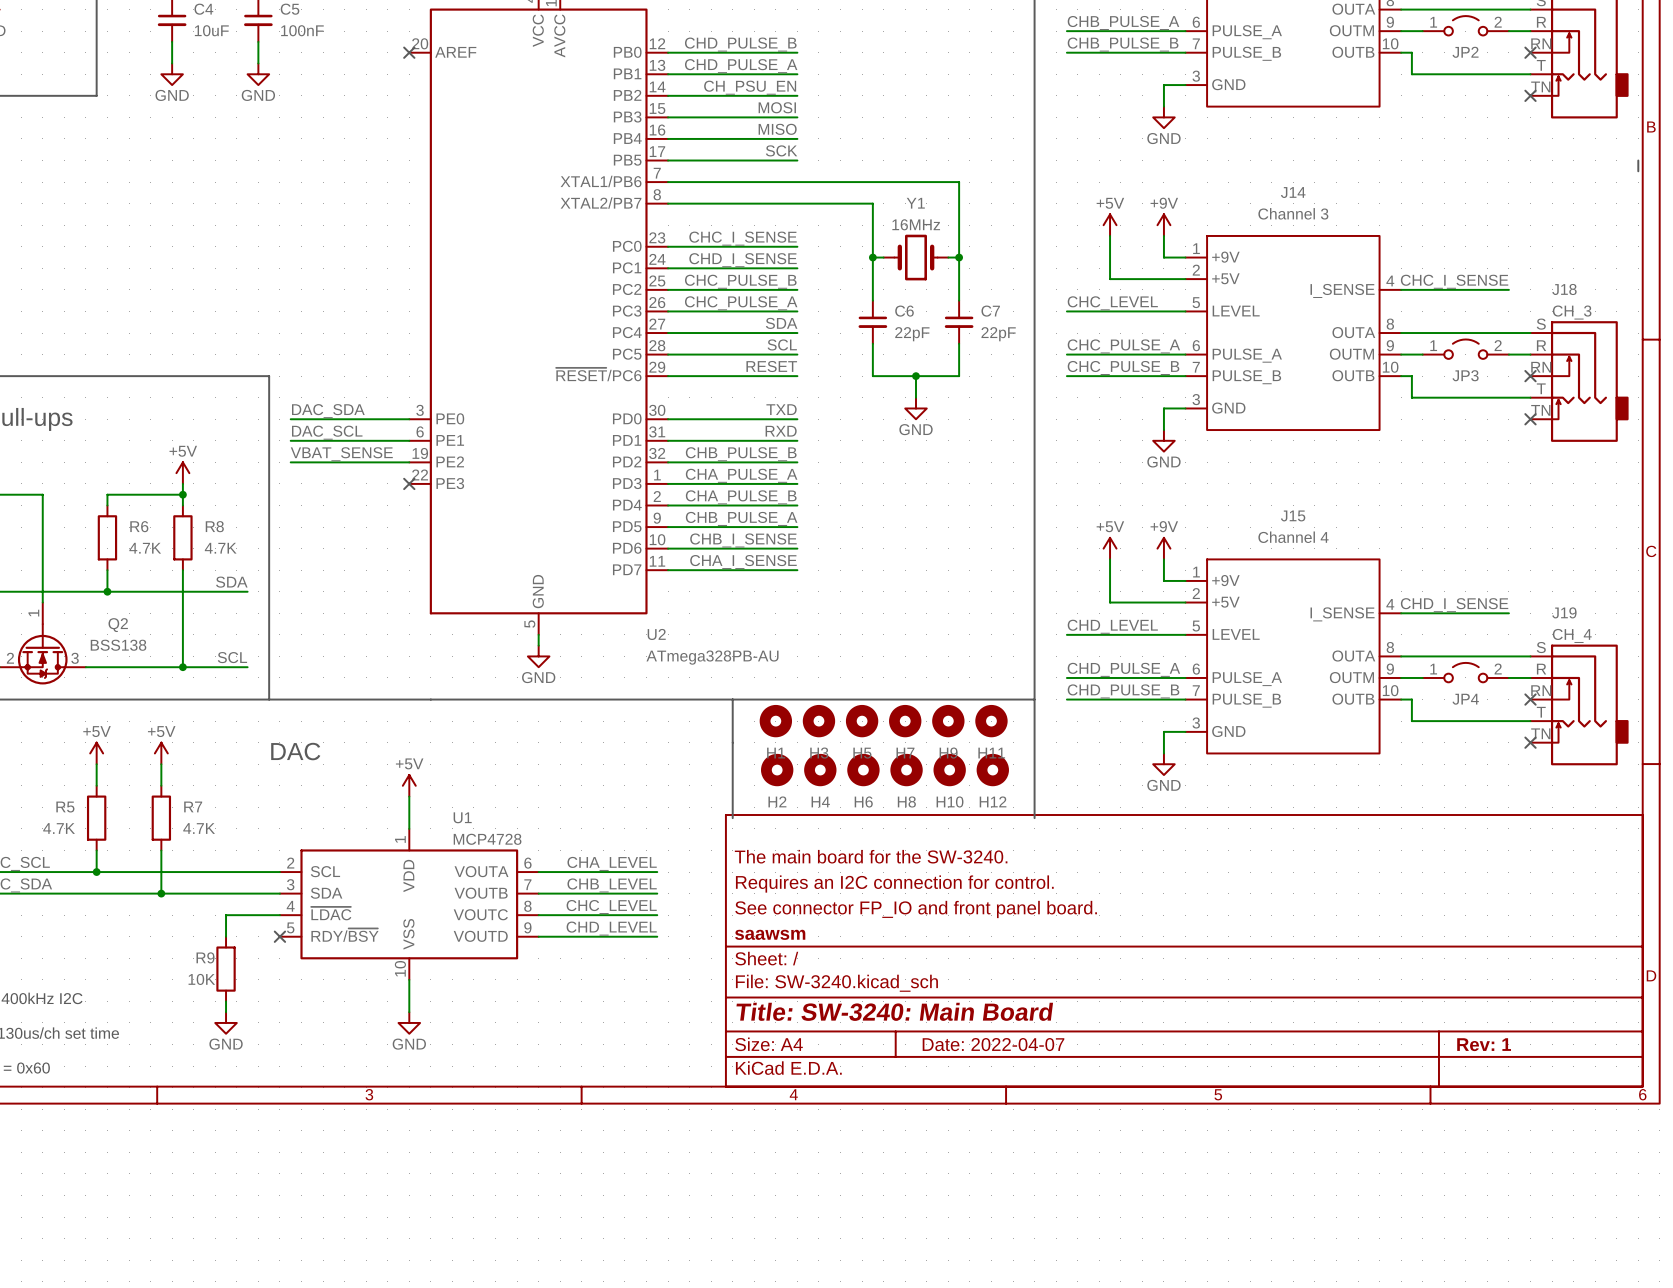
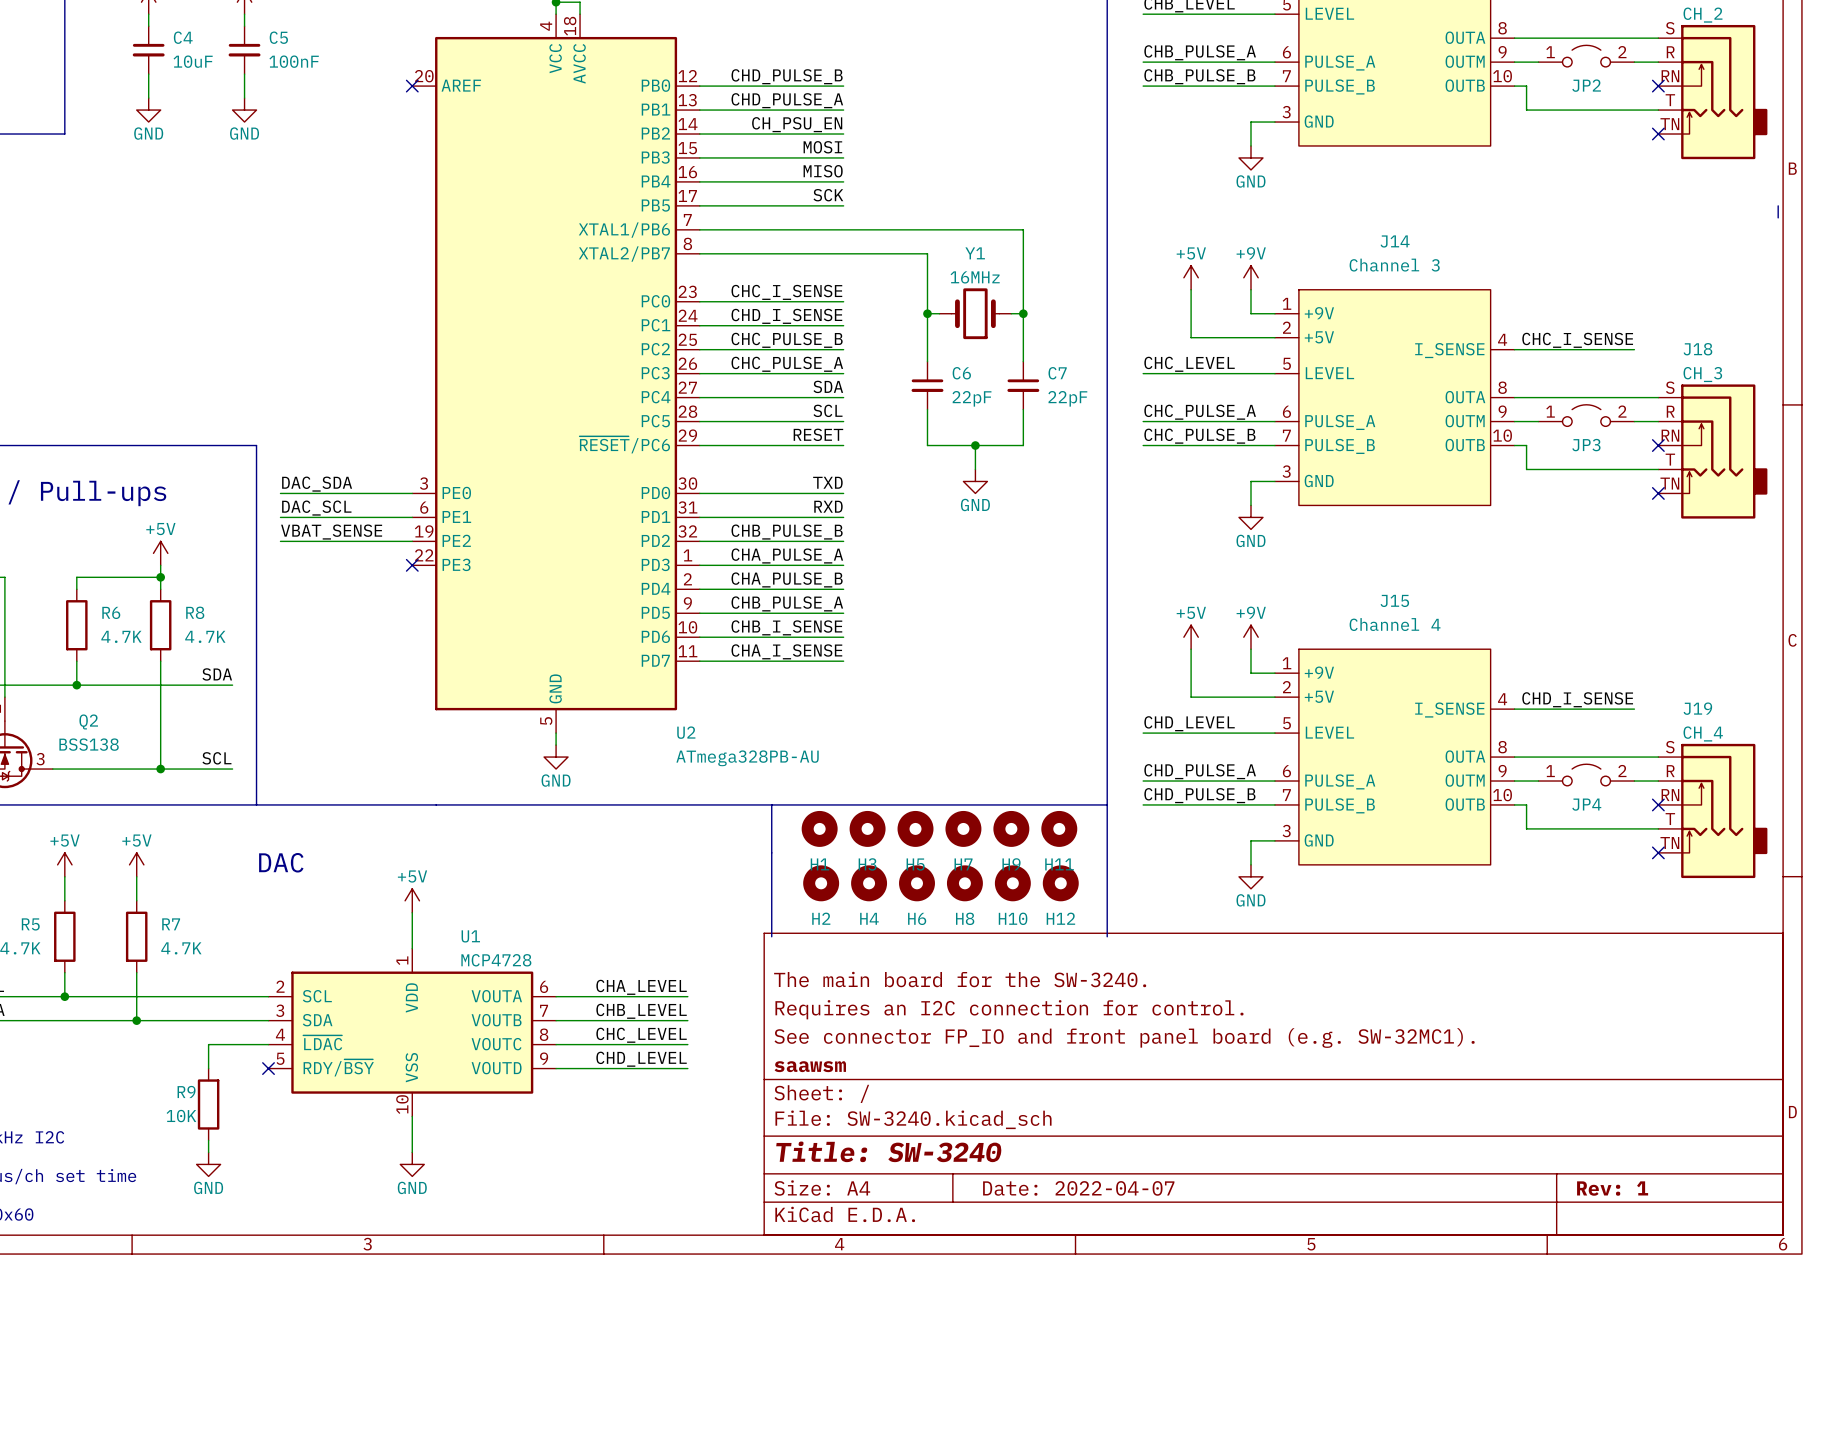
title block: See connector FP_IO and front panel board. (916, 909) -> See connector FP_IO and front panel board (e.g. SW-32MC1). (1124, 1038)
title block: Title: SW-3240: Main Board (894, 1011) -> Title: SW-3240 (888, 1151)

